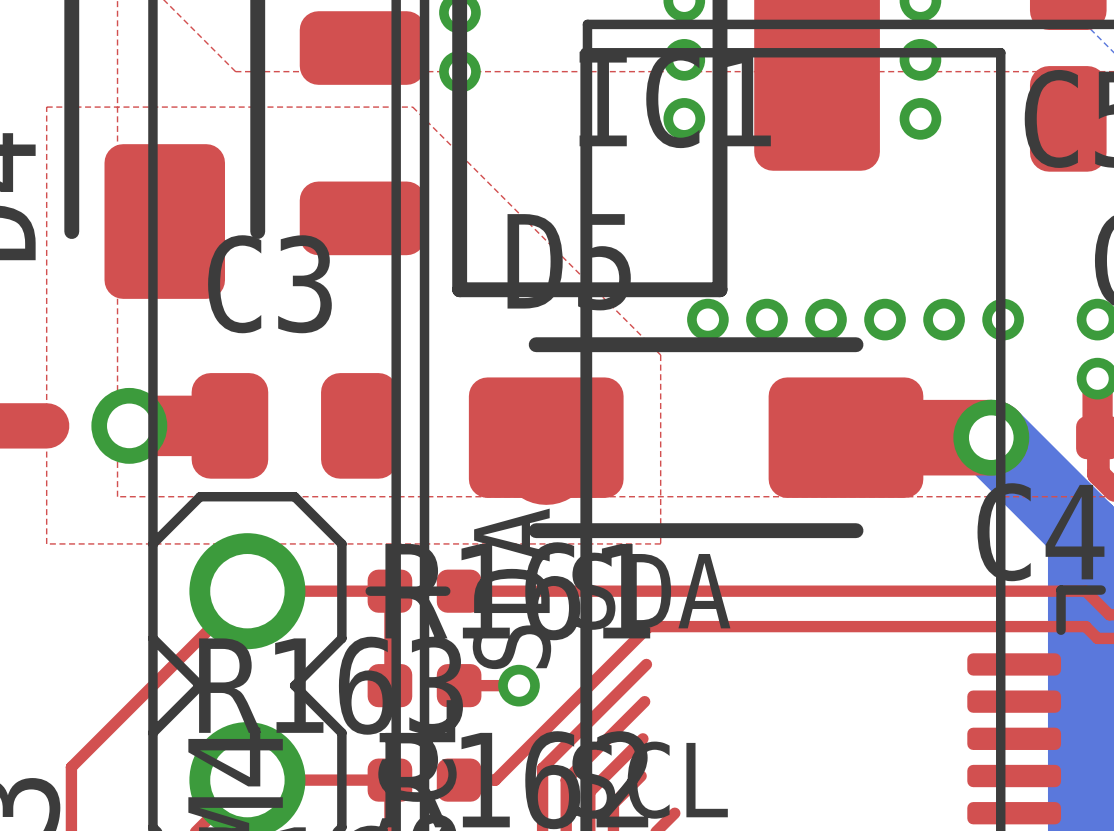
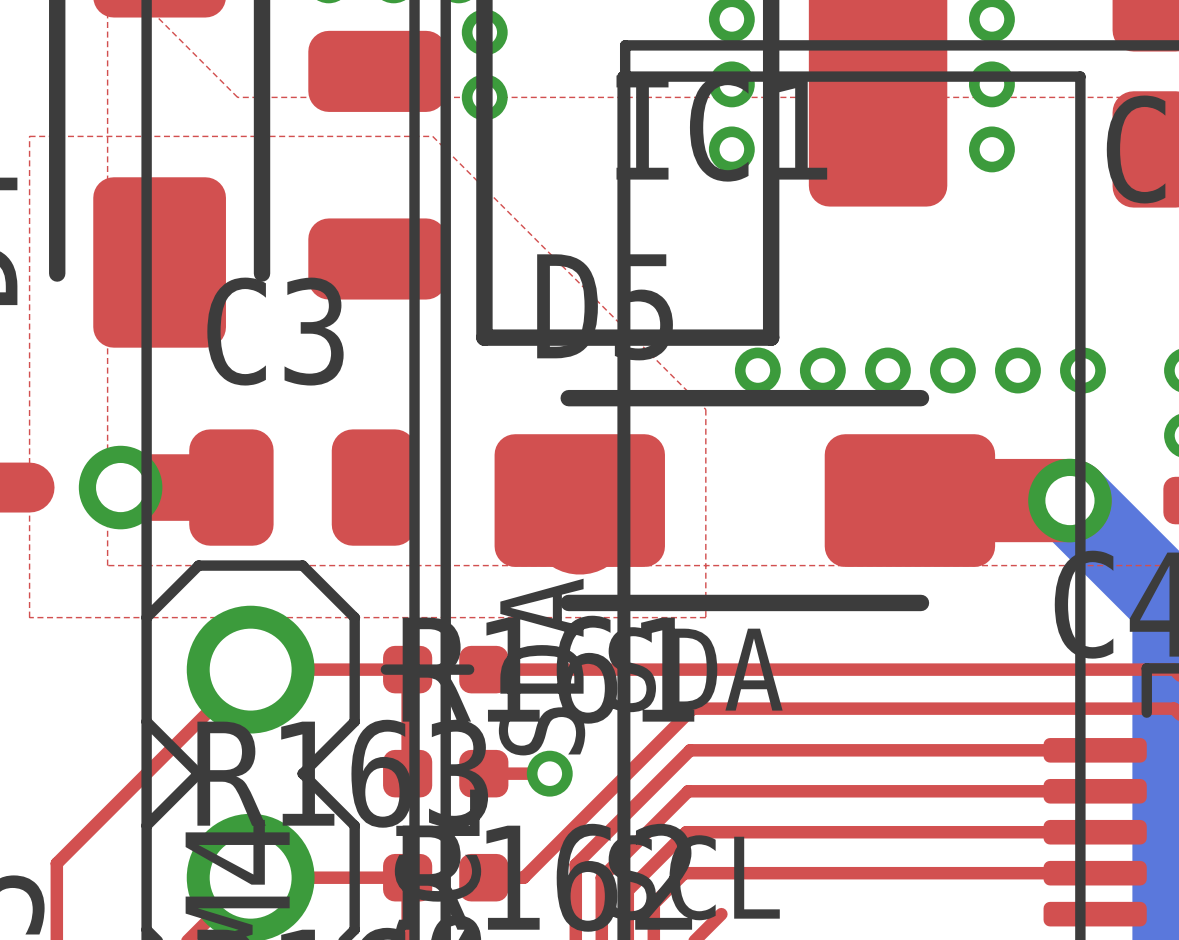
top track: none -> (690, 750) (1095, 750)
top track: none -> (688, 791) (1095, 791)
top track: none -> (686, 832) (1095, 832)
top track: none -> (684, 873) (1095, 873)

